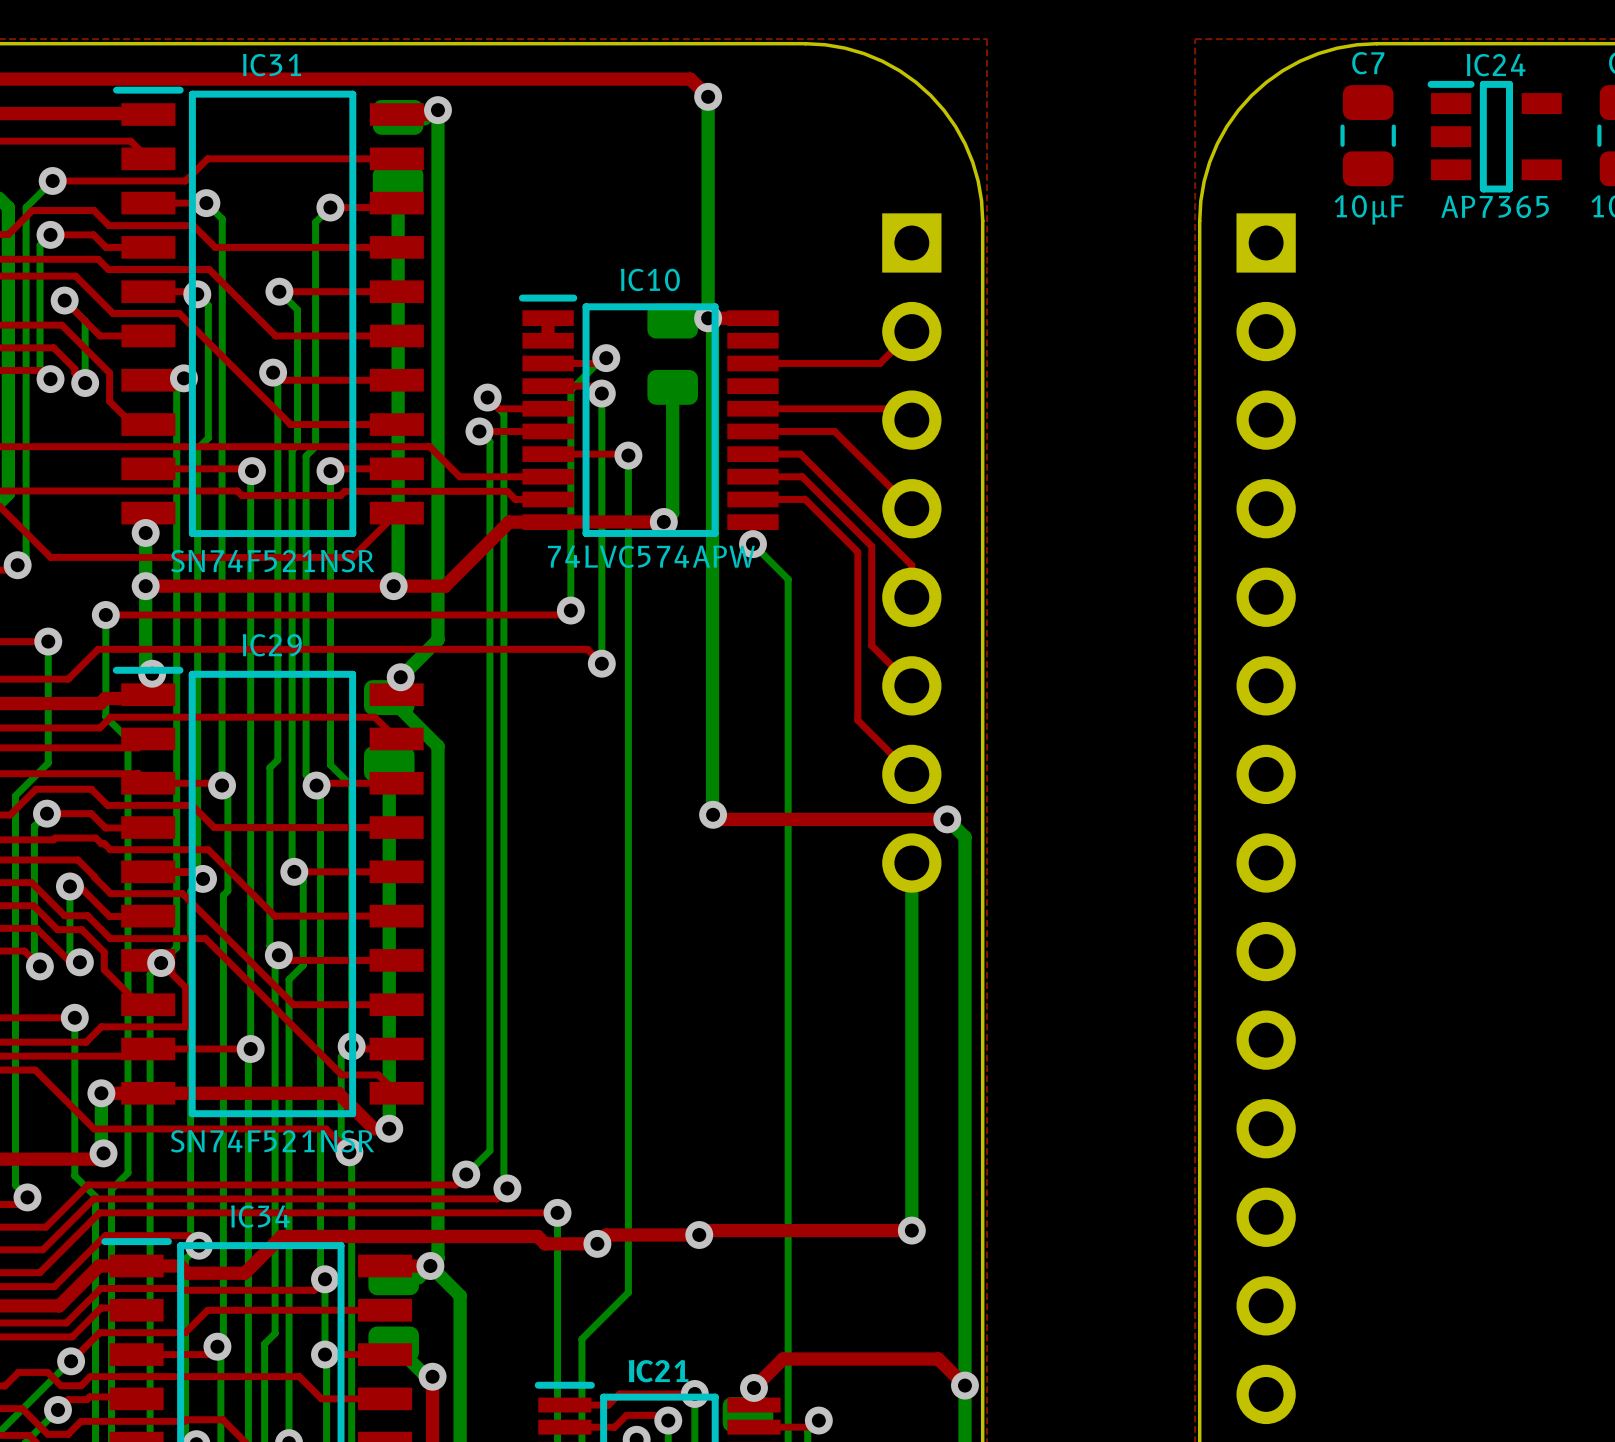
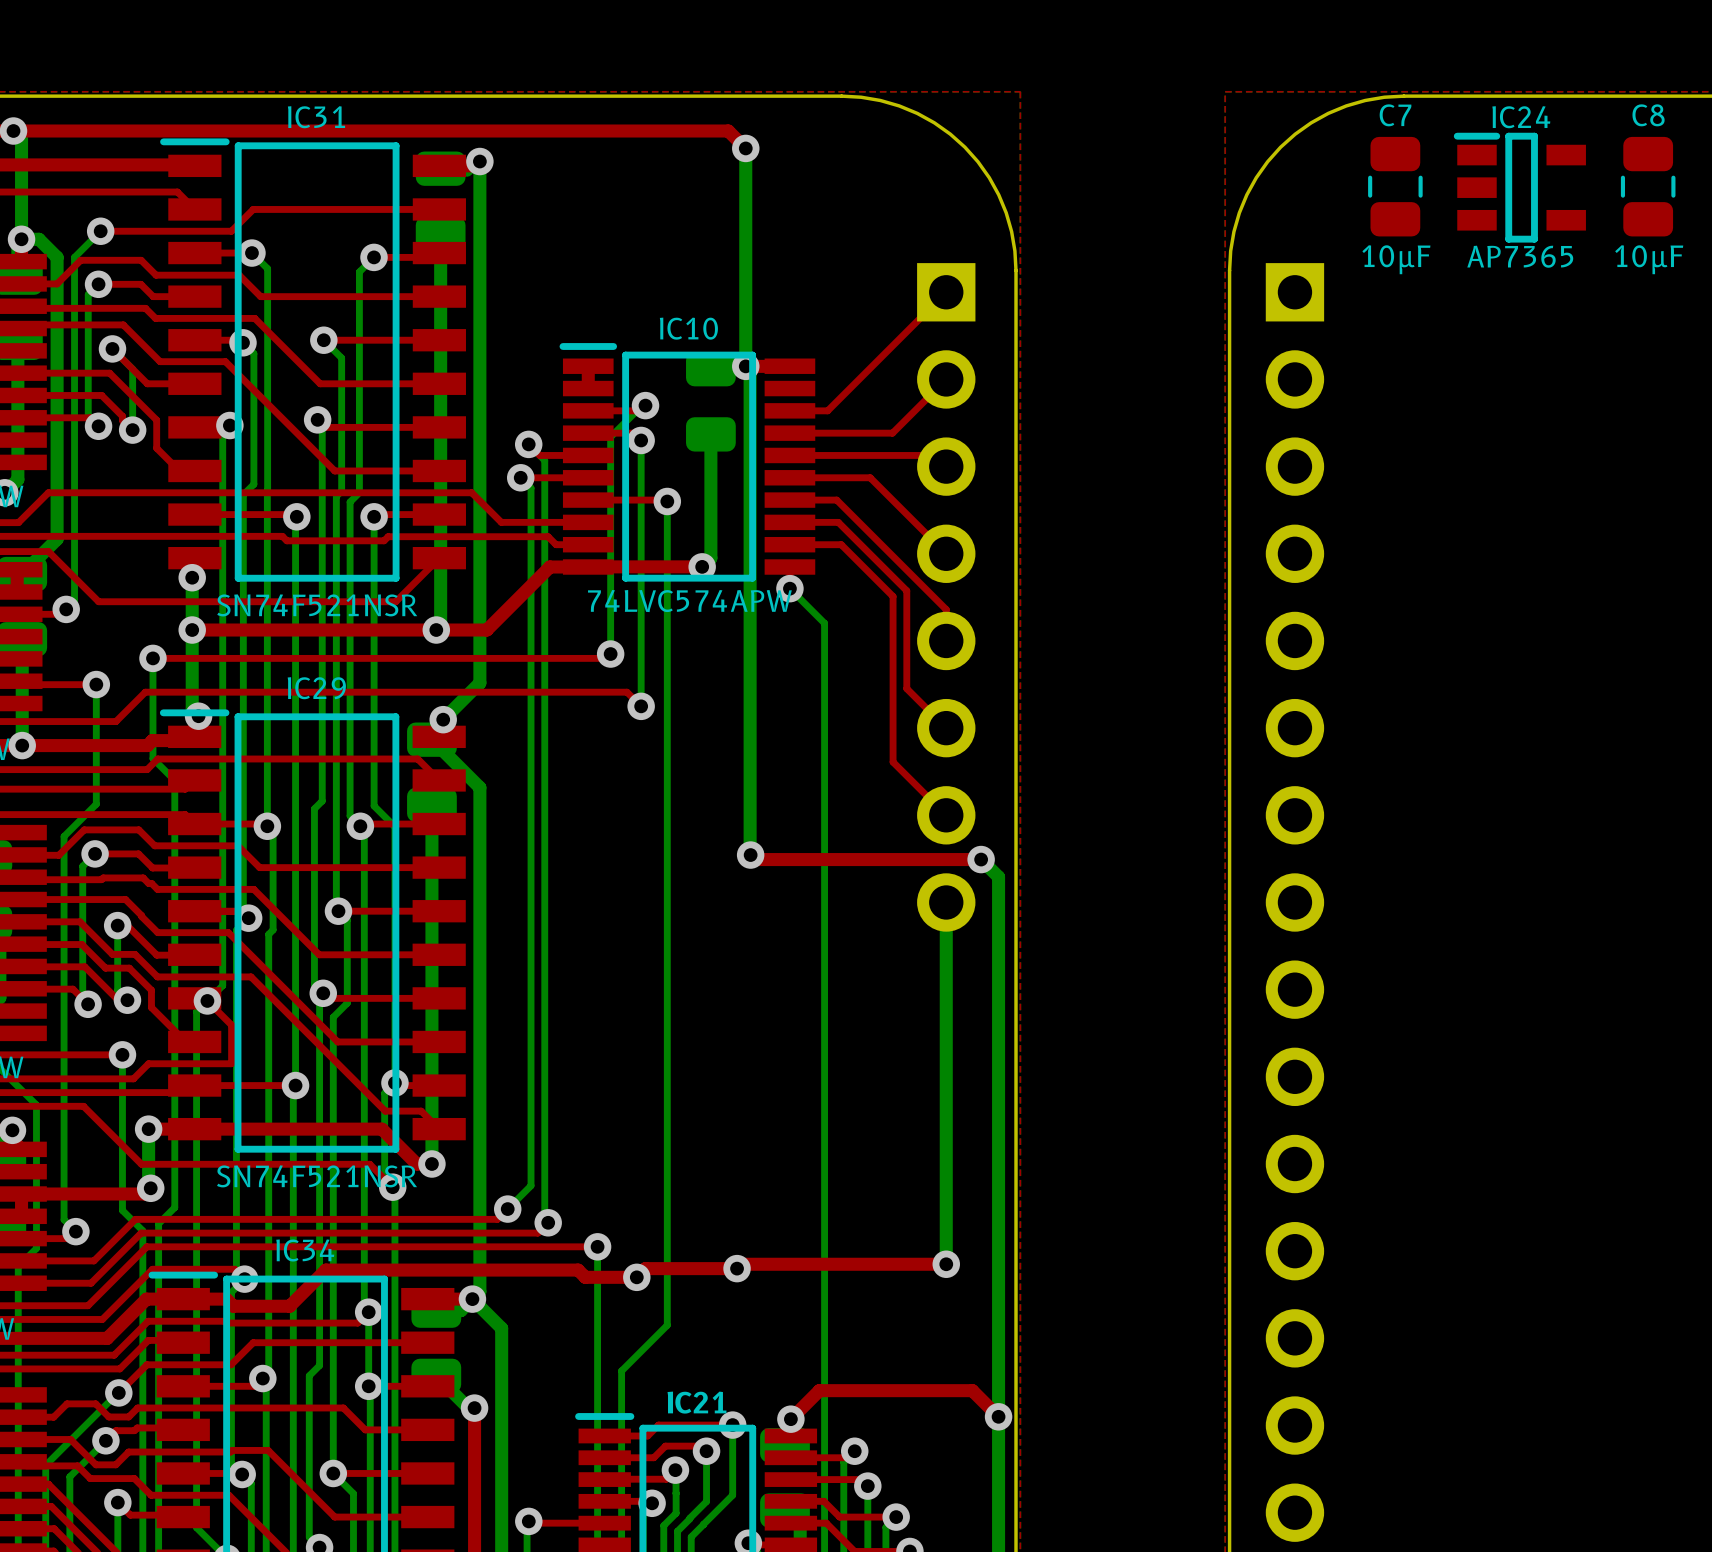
top track: none -> (946, 292) (827, 410)
top track: (791, 363) (879, 363) -> (789, 433) (892, 433) (914, 410)

